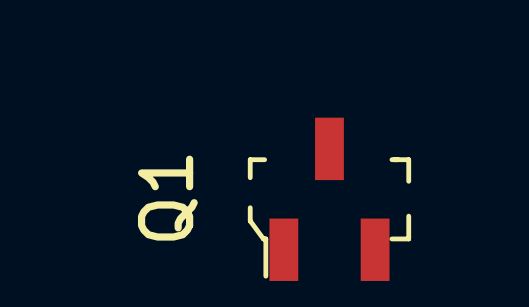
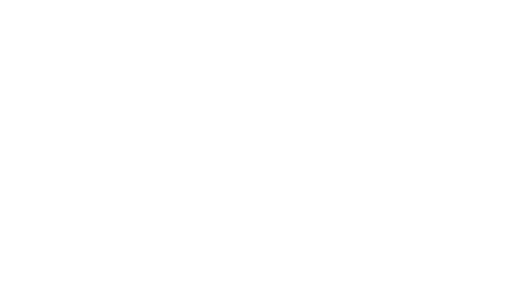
Q1: (329, 199) -> none

